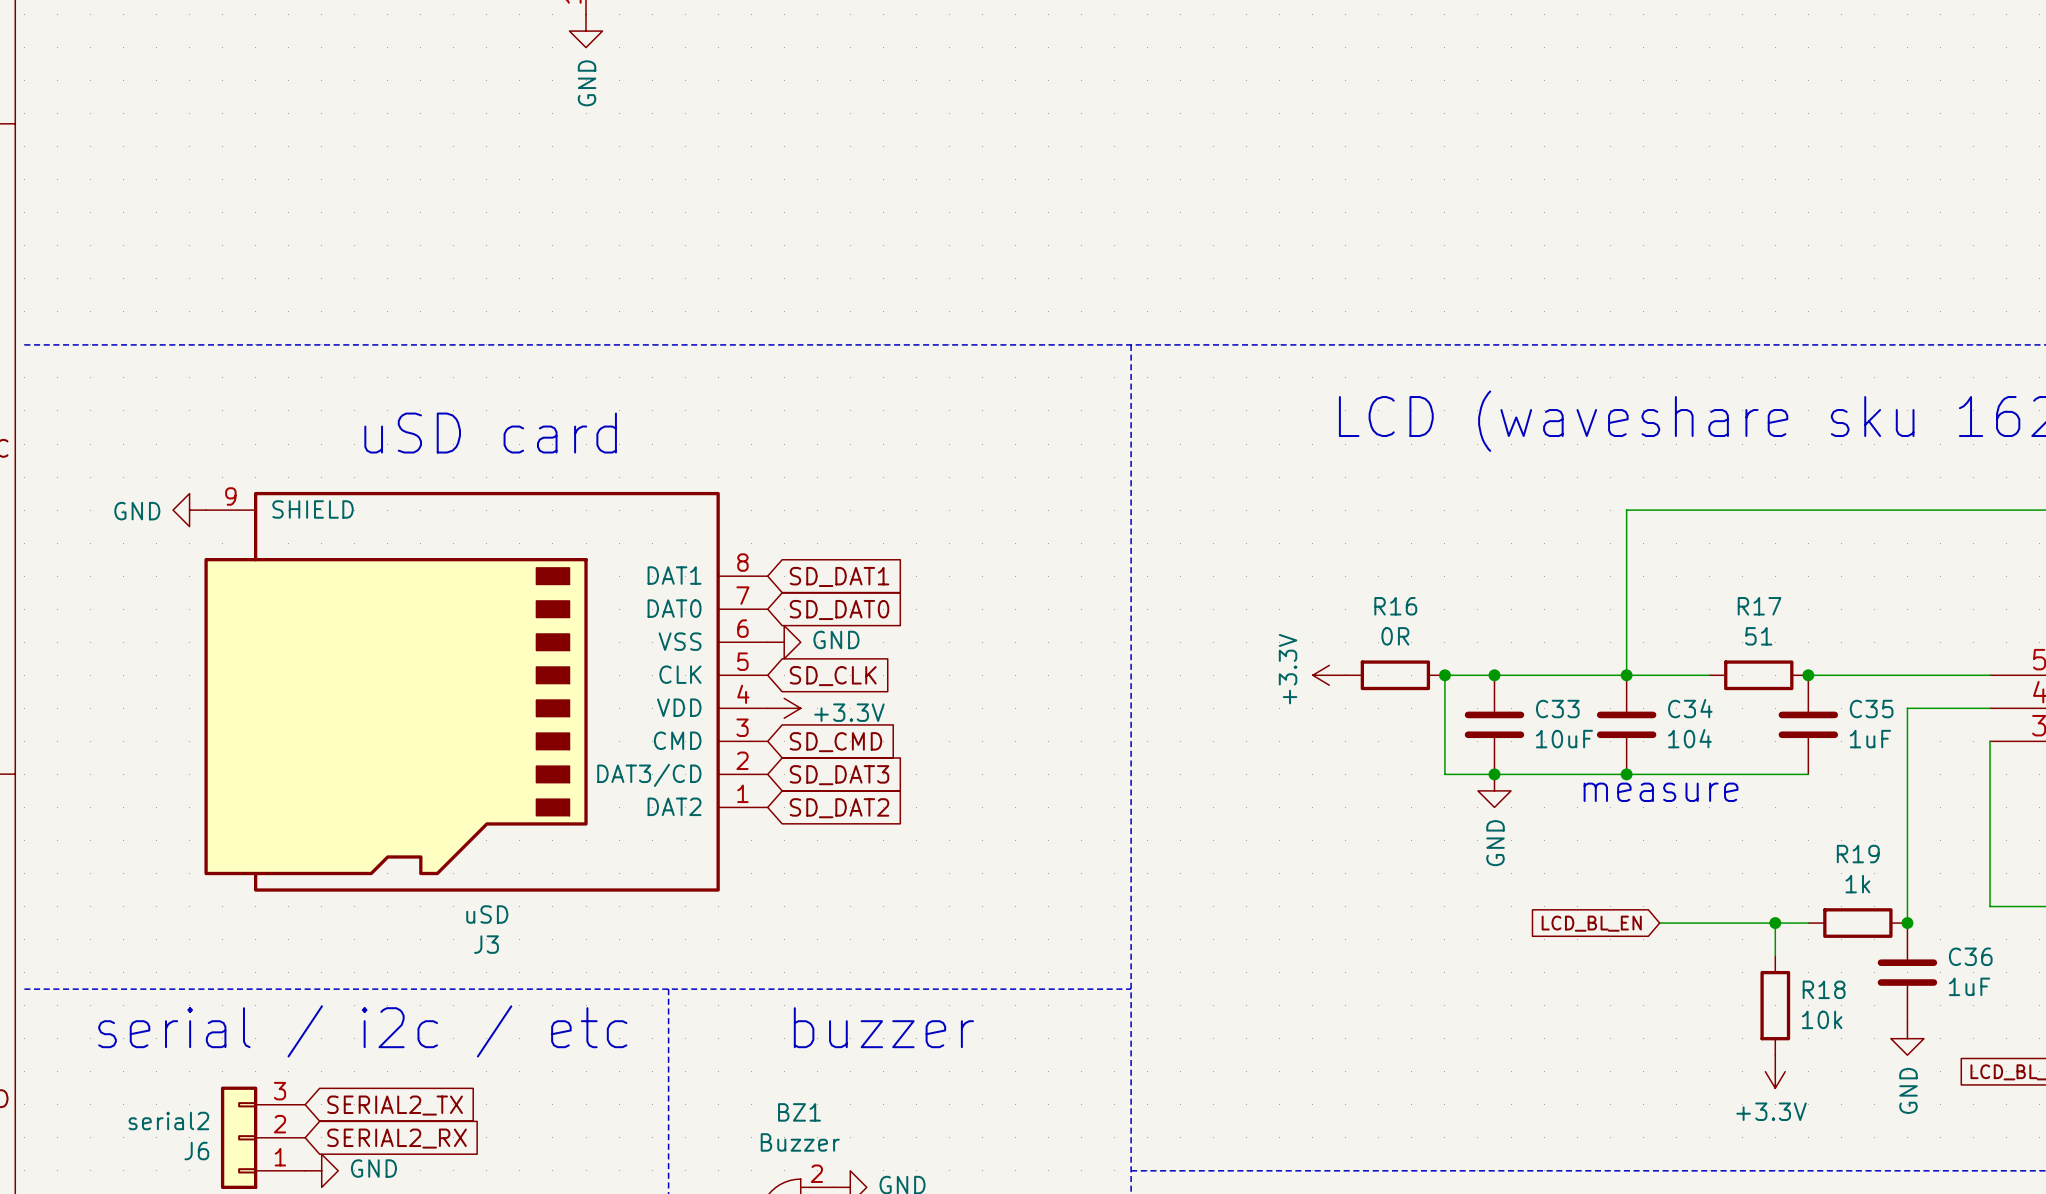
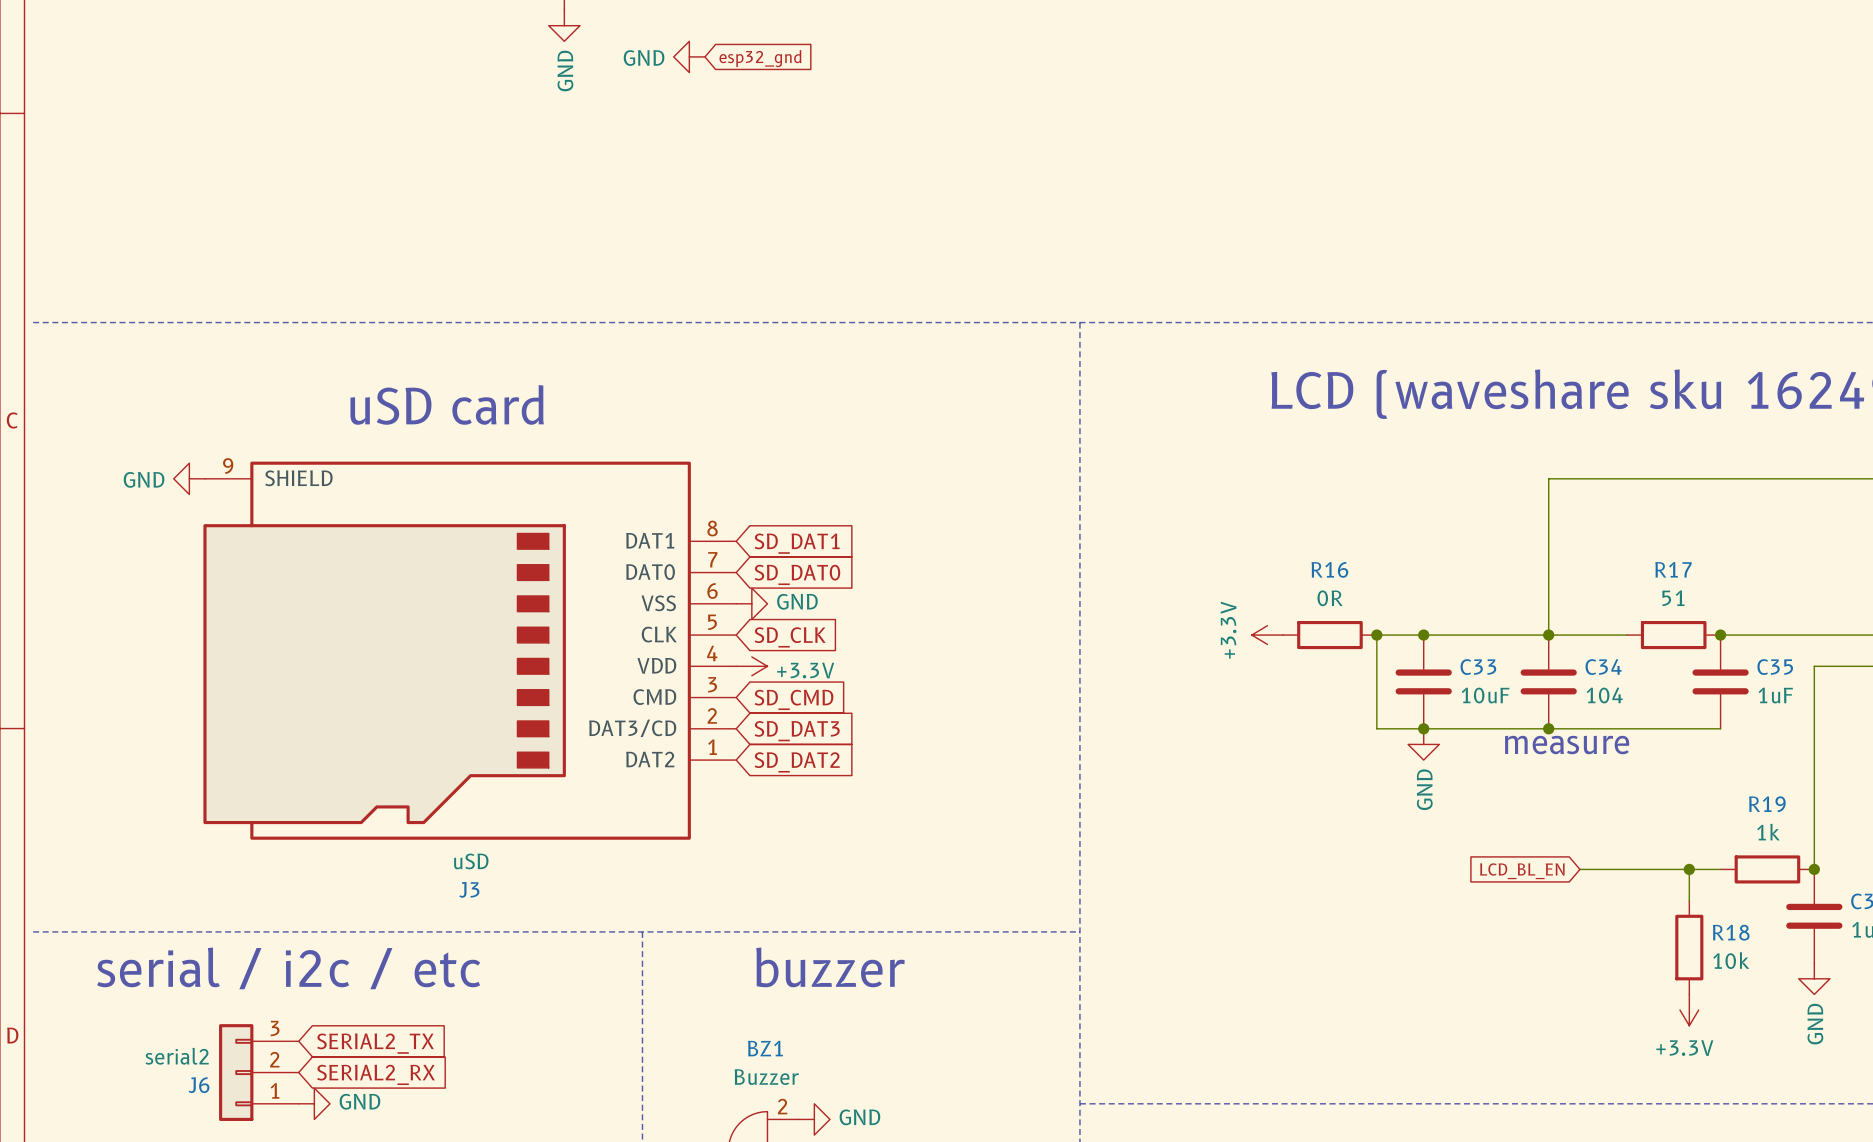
power symbol: none -> GND (689, 56)
global label: none -> esp32_gnd (760, 58)

